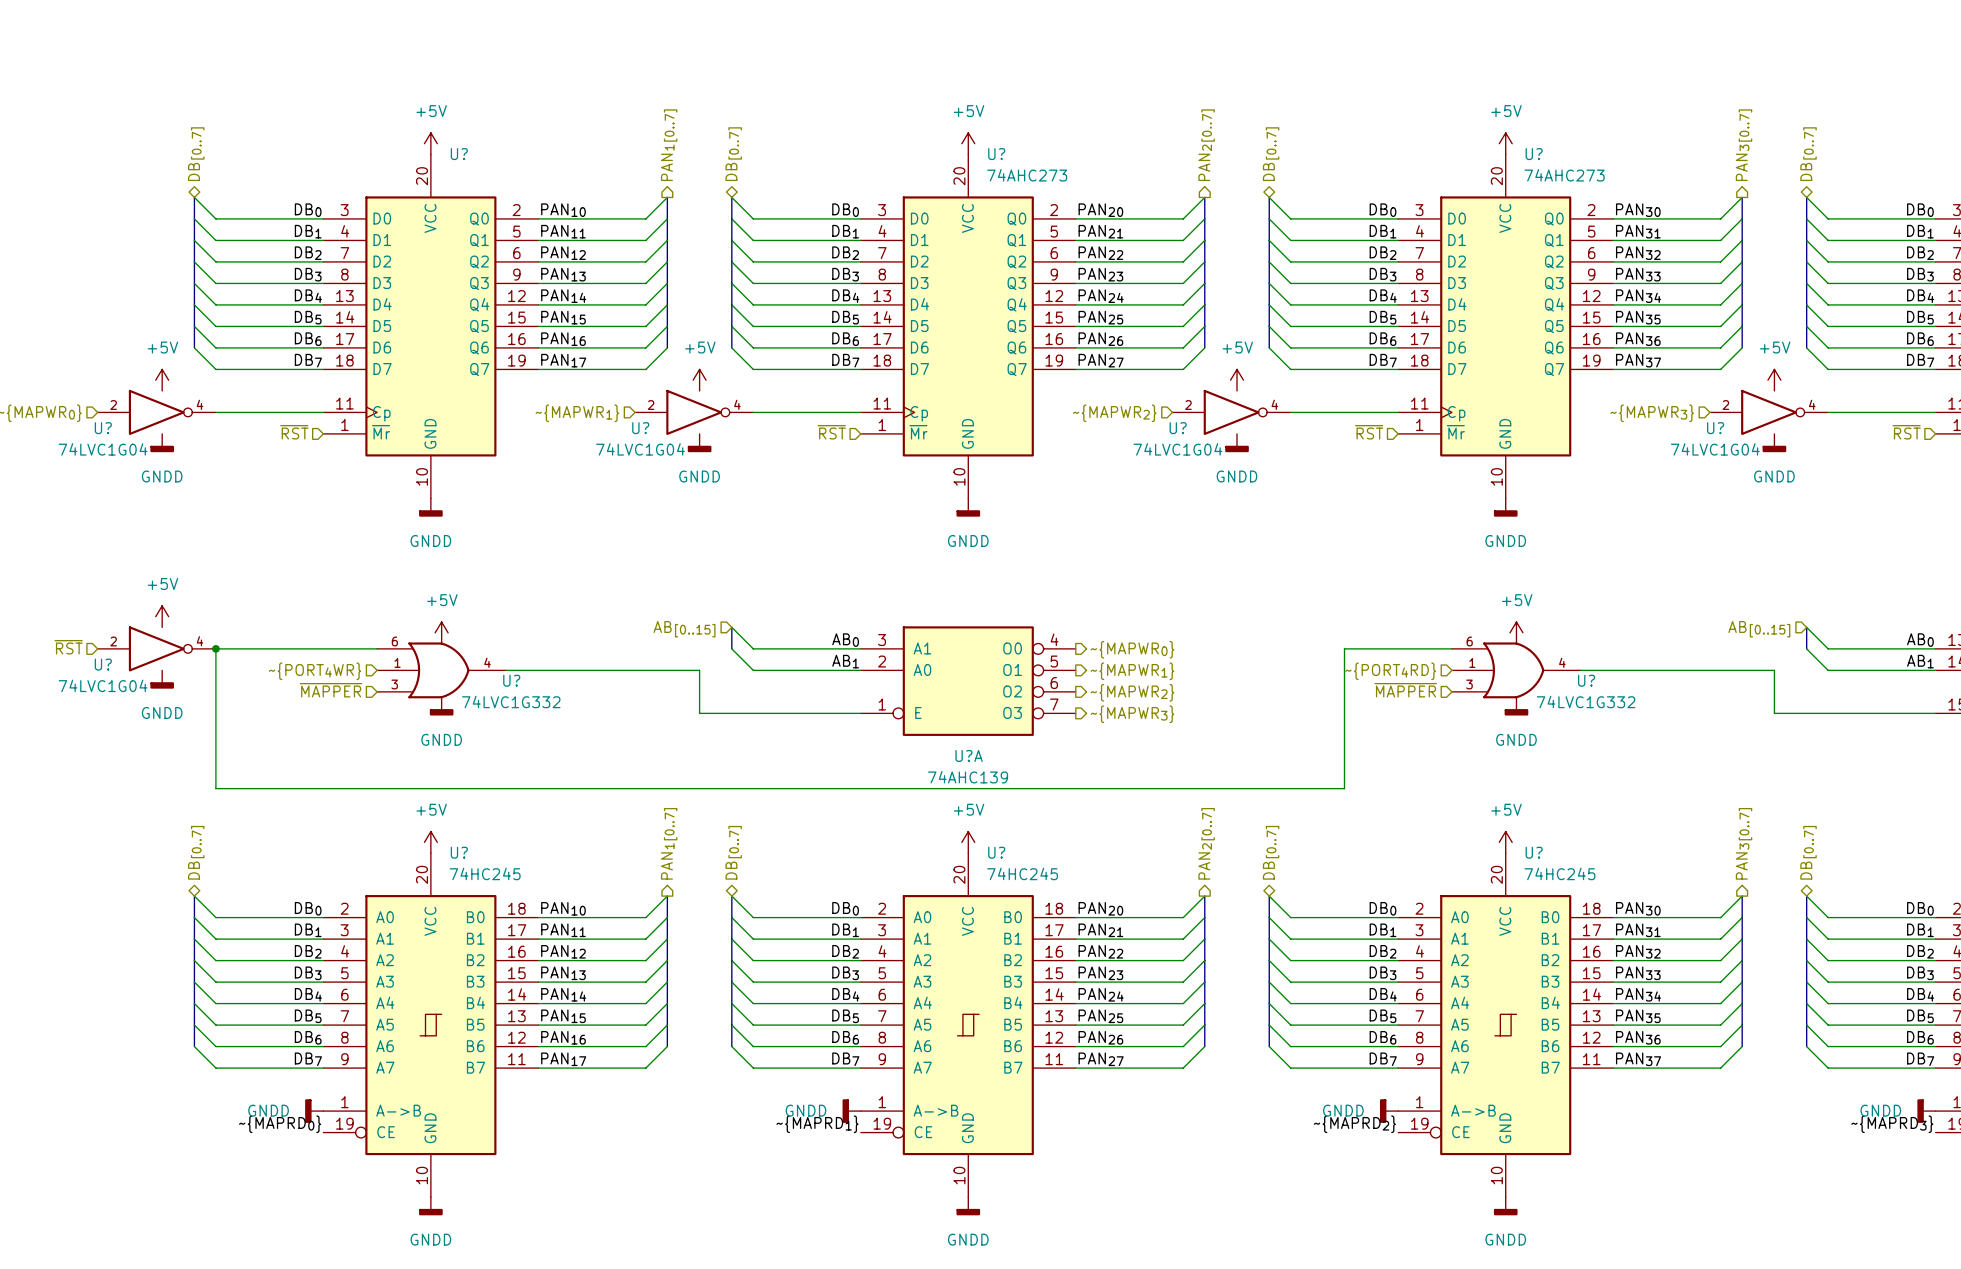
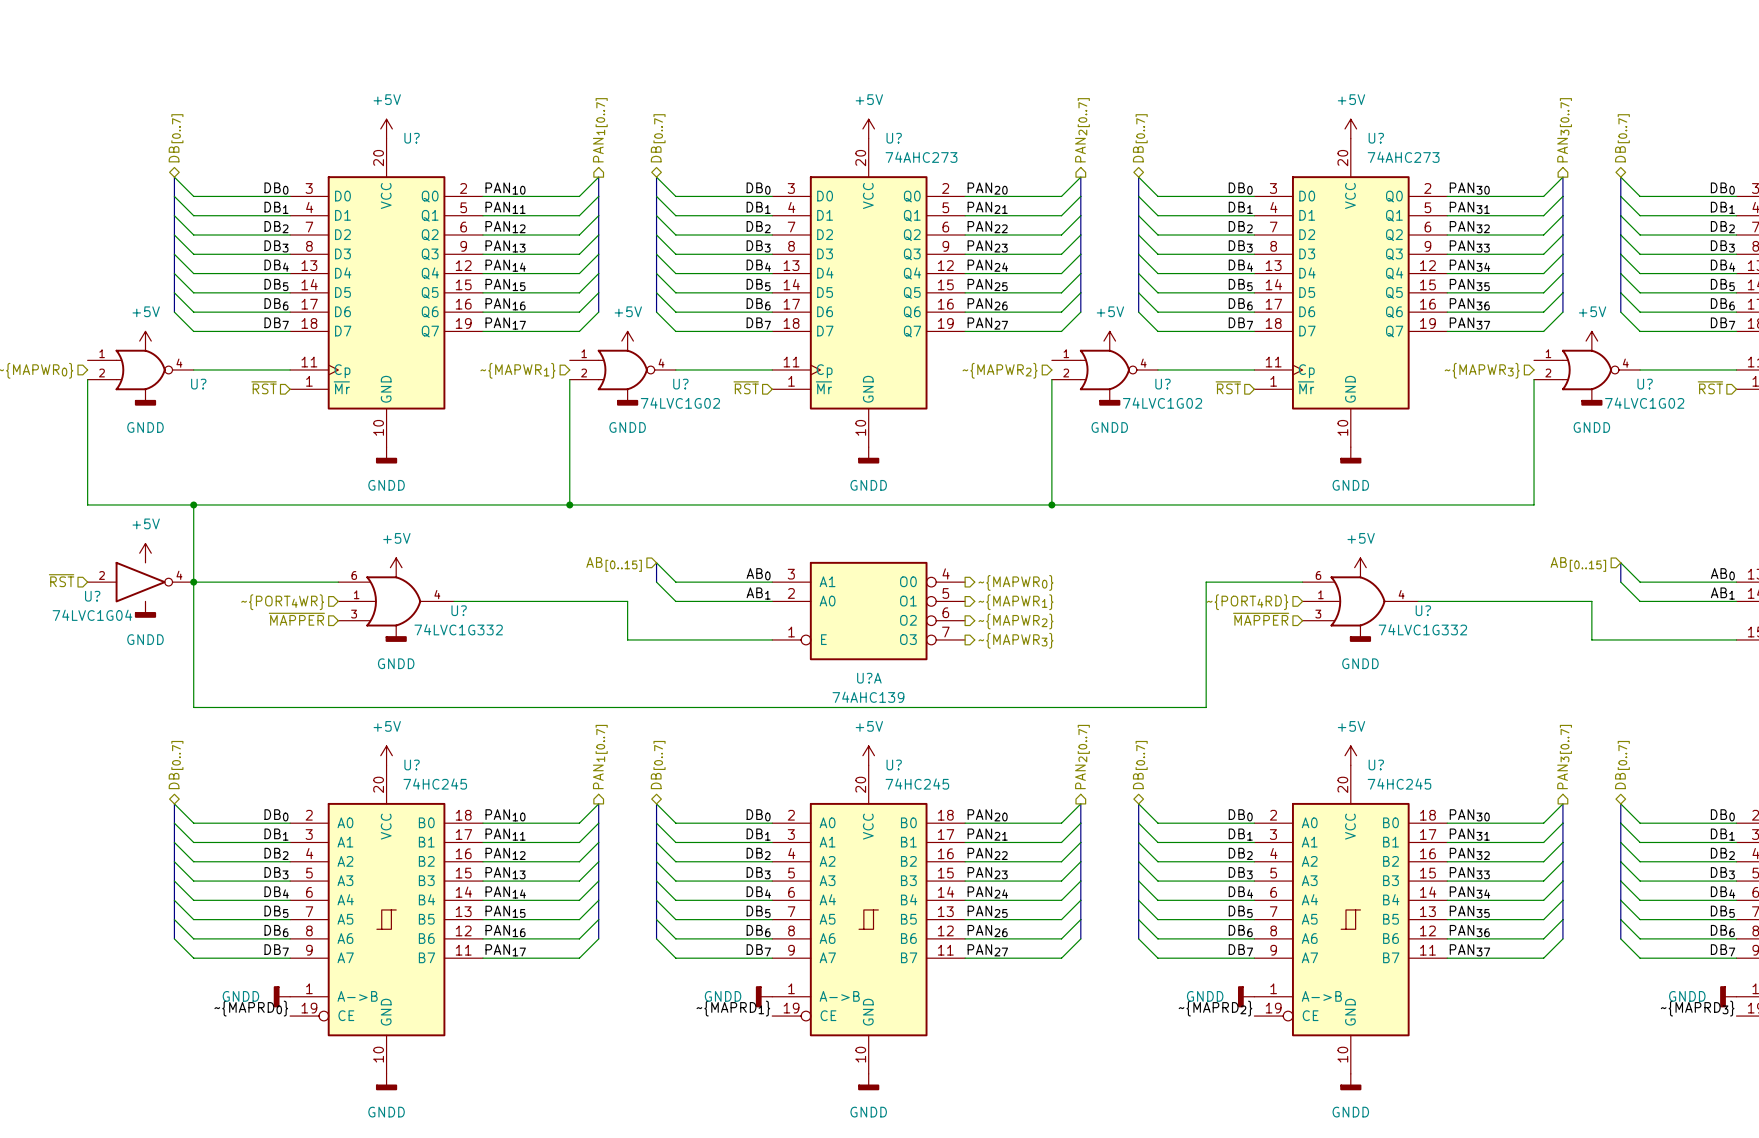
U? symbol: [97, 389, 216, 436] -> [87, 349, 194, 391]
U? symbol: [635, 389, 754, 436] -> [569, 349, 676, 391]
U? symbol: [1172, 389, 1291, 436] -> [1051, 349, 1158, 391]
U? symbol: [1709, 389, 1829, 436] -> [1534, 349, 1641, 391]
wire: none -> (87, 379) (87, 504) (1534, 504) (1534, 379)
wire: none -> (569, 379) (569, 504)
wire: none -> (1051, 379) (1051, 504)
U? name position: U? (103, 428) -> U? (198, 384)
U? name position: U? (640, 428) -> U? (680, 384)
U? name position: U? (1178, 428) -> U? (1163, 384)
U? name position: U? (1715, 428) -> U? (1645, 384)
U? value: 74LVC1G04 (103, 449) -> none
U? value: 74LVC1G04 (640, 449) -> 74LVC1G02 (680, 403)
U? value: 74LVC1G04 (1177, 449) -> 74LVC1G02 (1162, 403)
U? value: 74LVC1G04 (1715, 449) -> 74LVC1G02 (1644, 403)
wire: none -> (193, 504) (193, 582)
junction: none -> (193, 504)
junction: none -> (569, 504)
junction: none -> (1051, 504)

